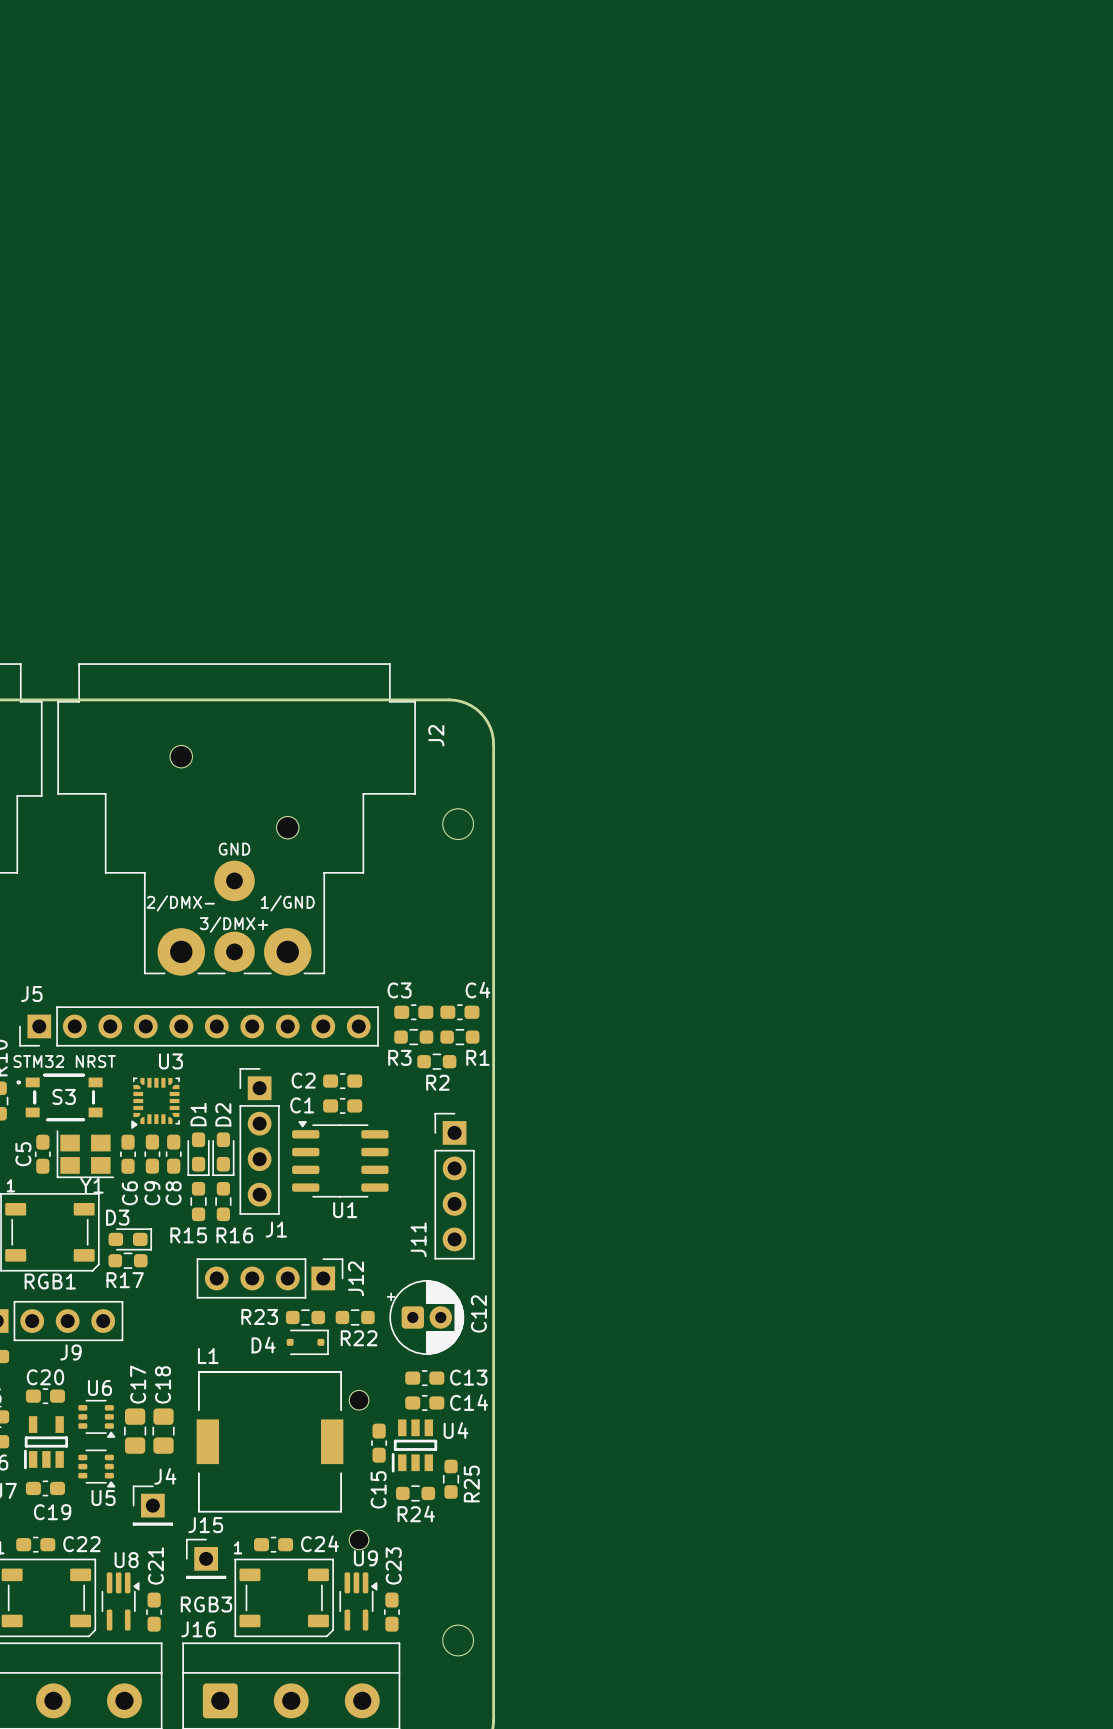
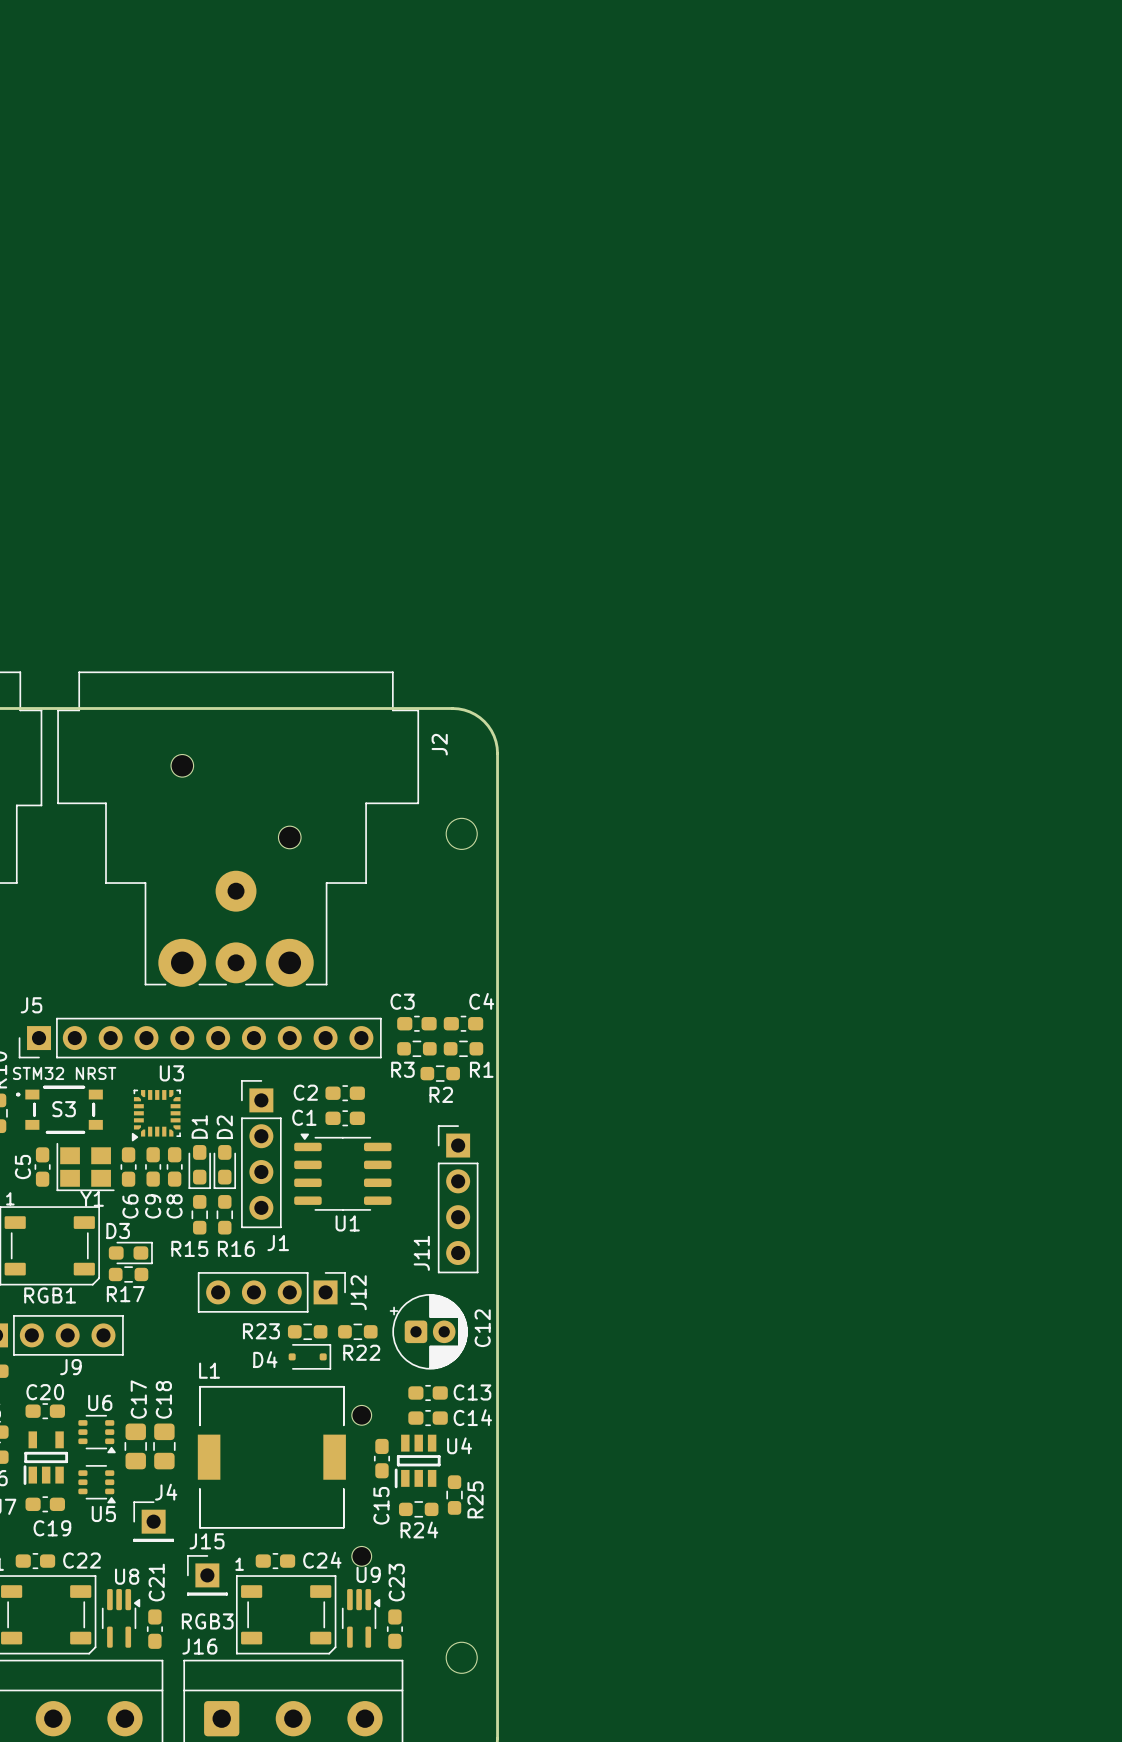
text: GND (234, 849) -> none
text: 2/DMX- (180, 903) -> none
text: 1/GND (287, 903) -> none
text: 3/DMX+ (233, 924) -> none

